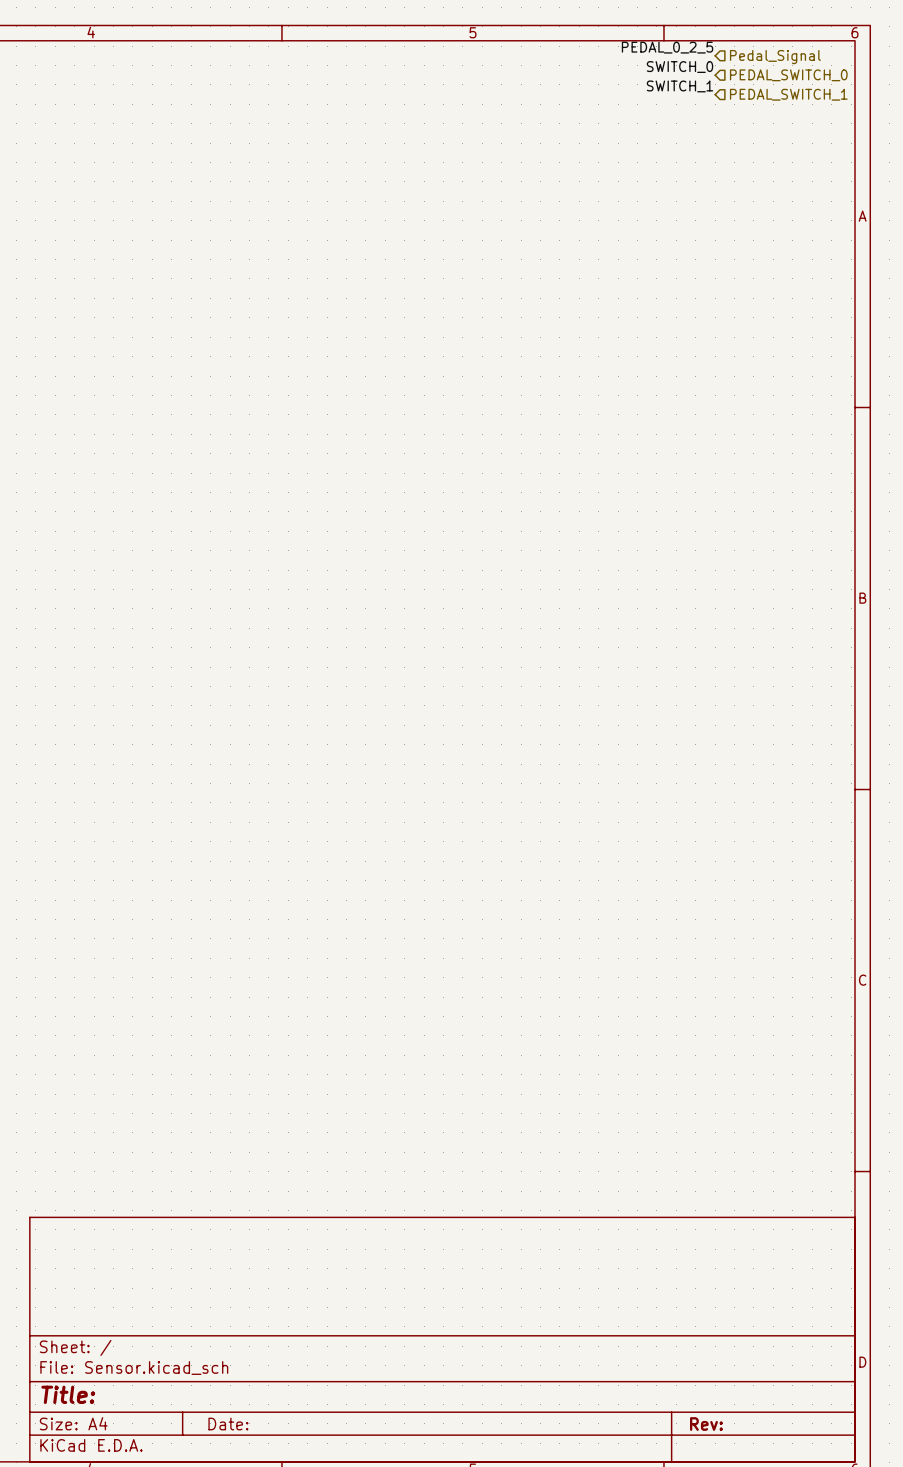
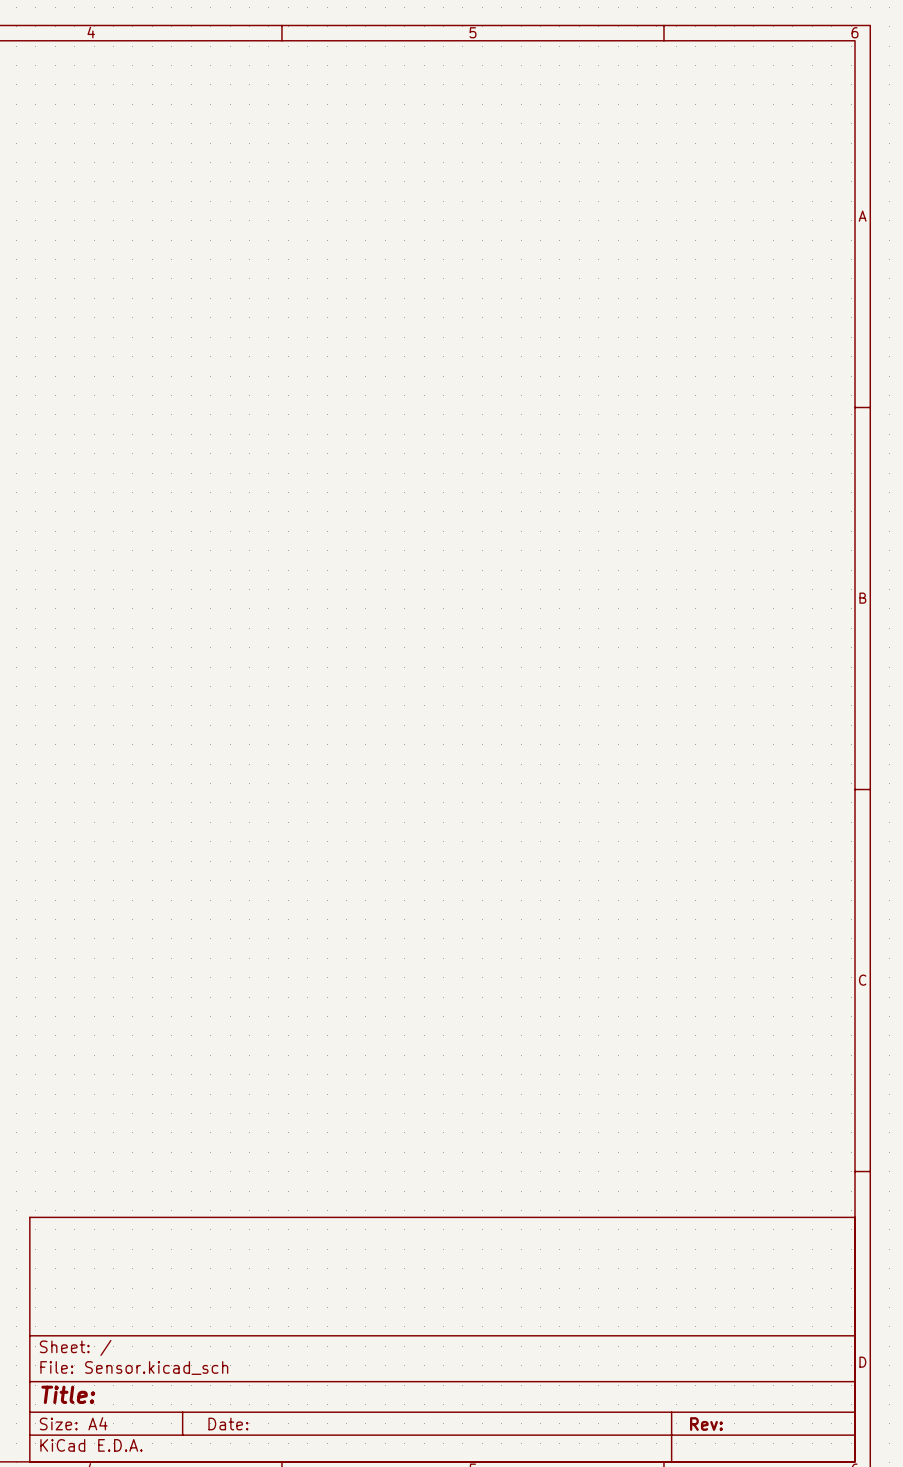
label: PEDAL_0_2_5 (667, 47) -> none
hierarchical label: Pedal_Signal (775, 57) -> none
label: SWITCH_0 (679, 67) -> none
hierarchical label: PEDAL_SWITCH_0 (788, 75) -> none
label: SWITCH_1 (679, 86) -> none
hierarchical label: PEDAL_SWITCH_1 (788, 94) -> none

